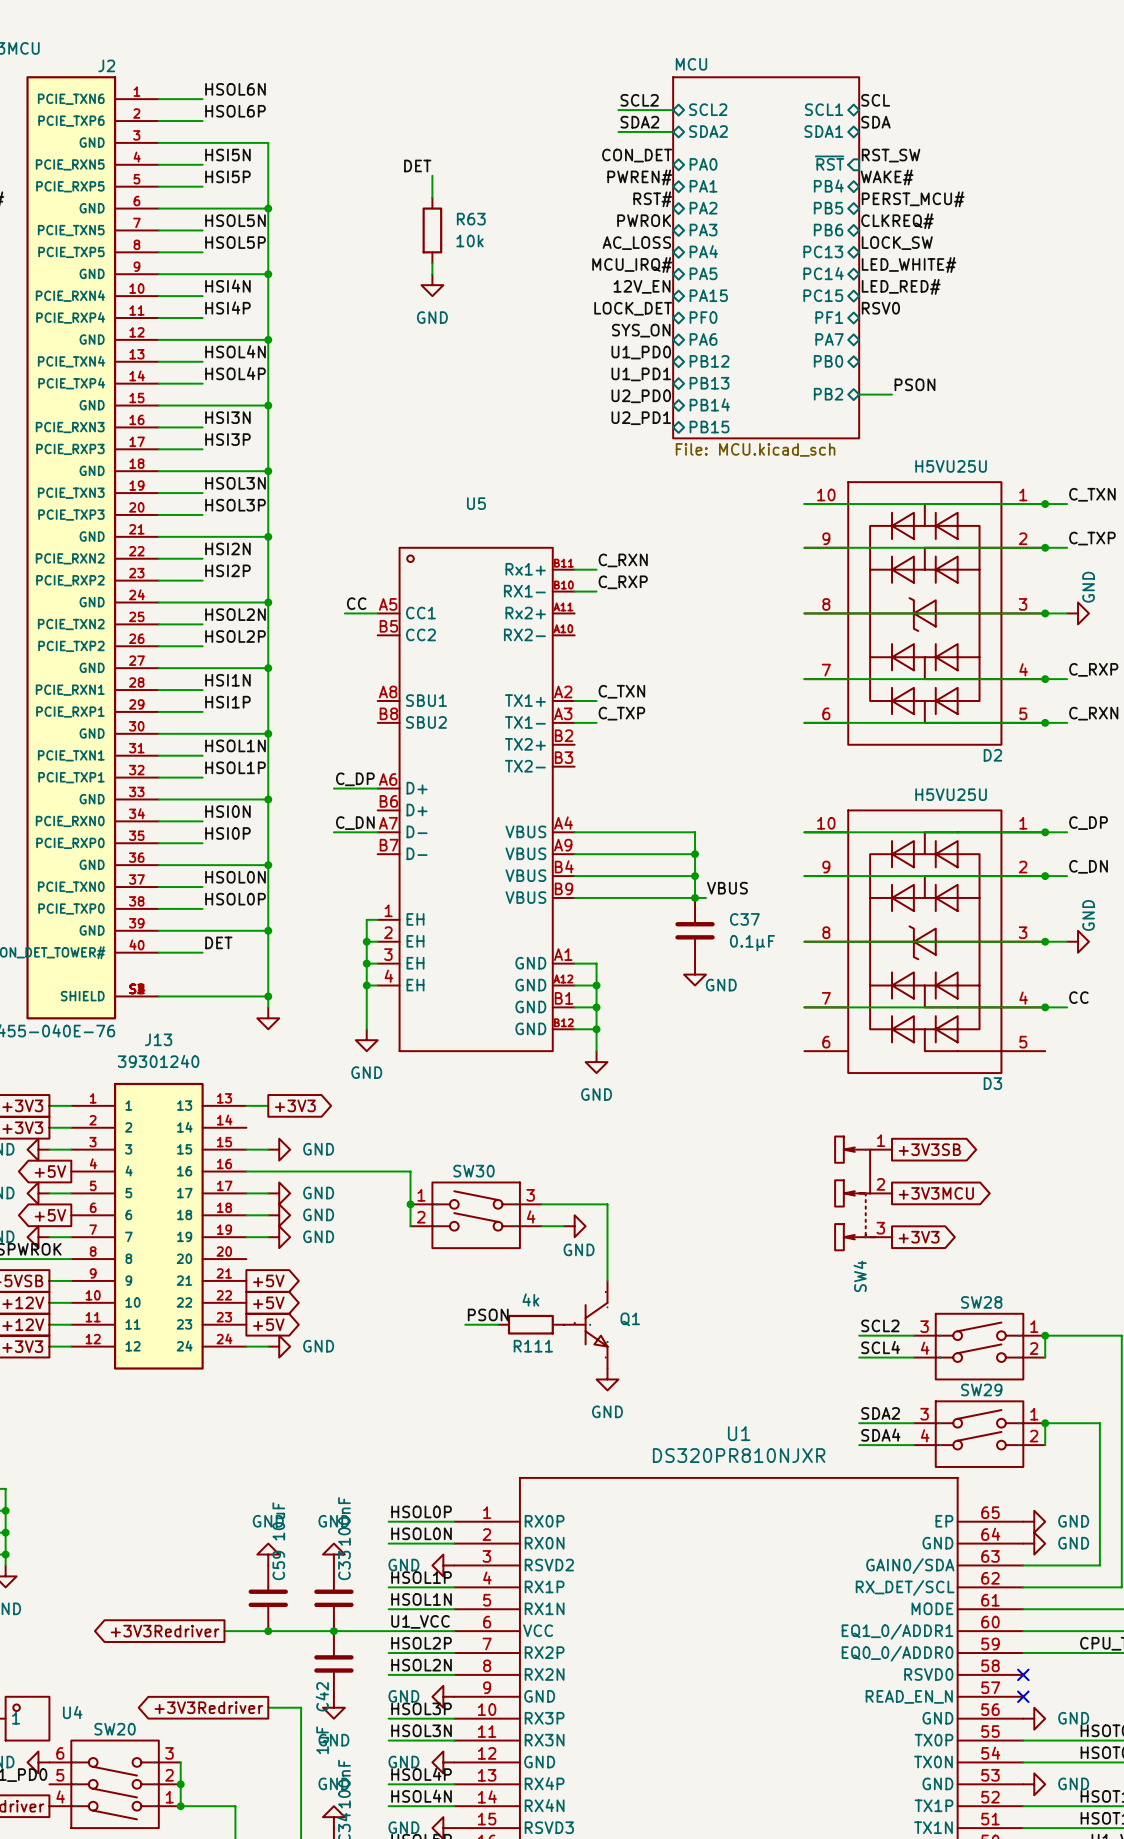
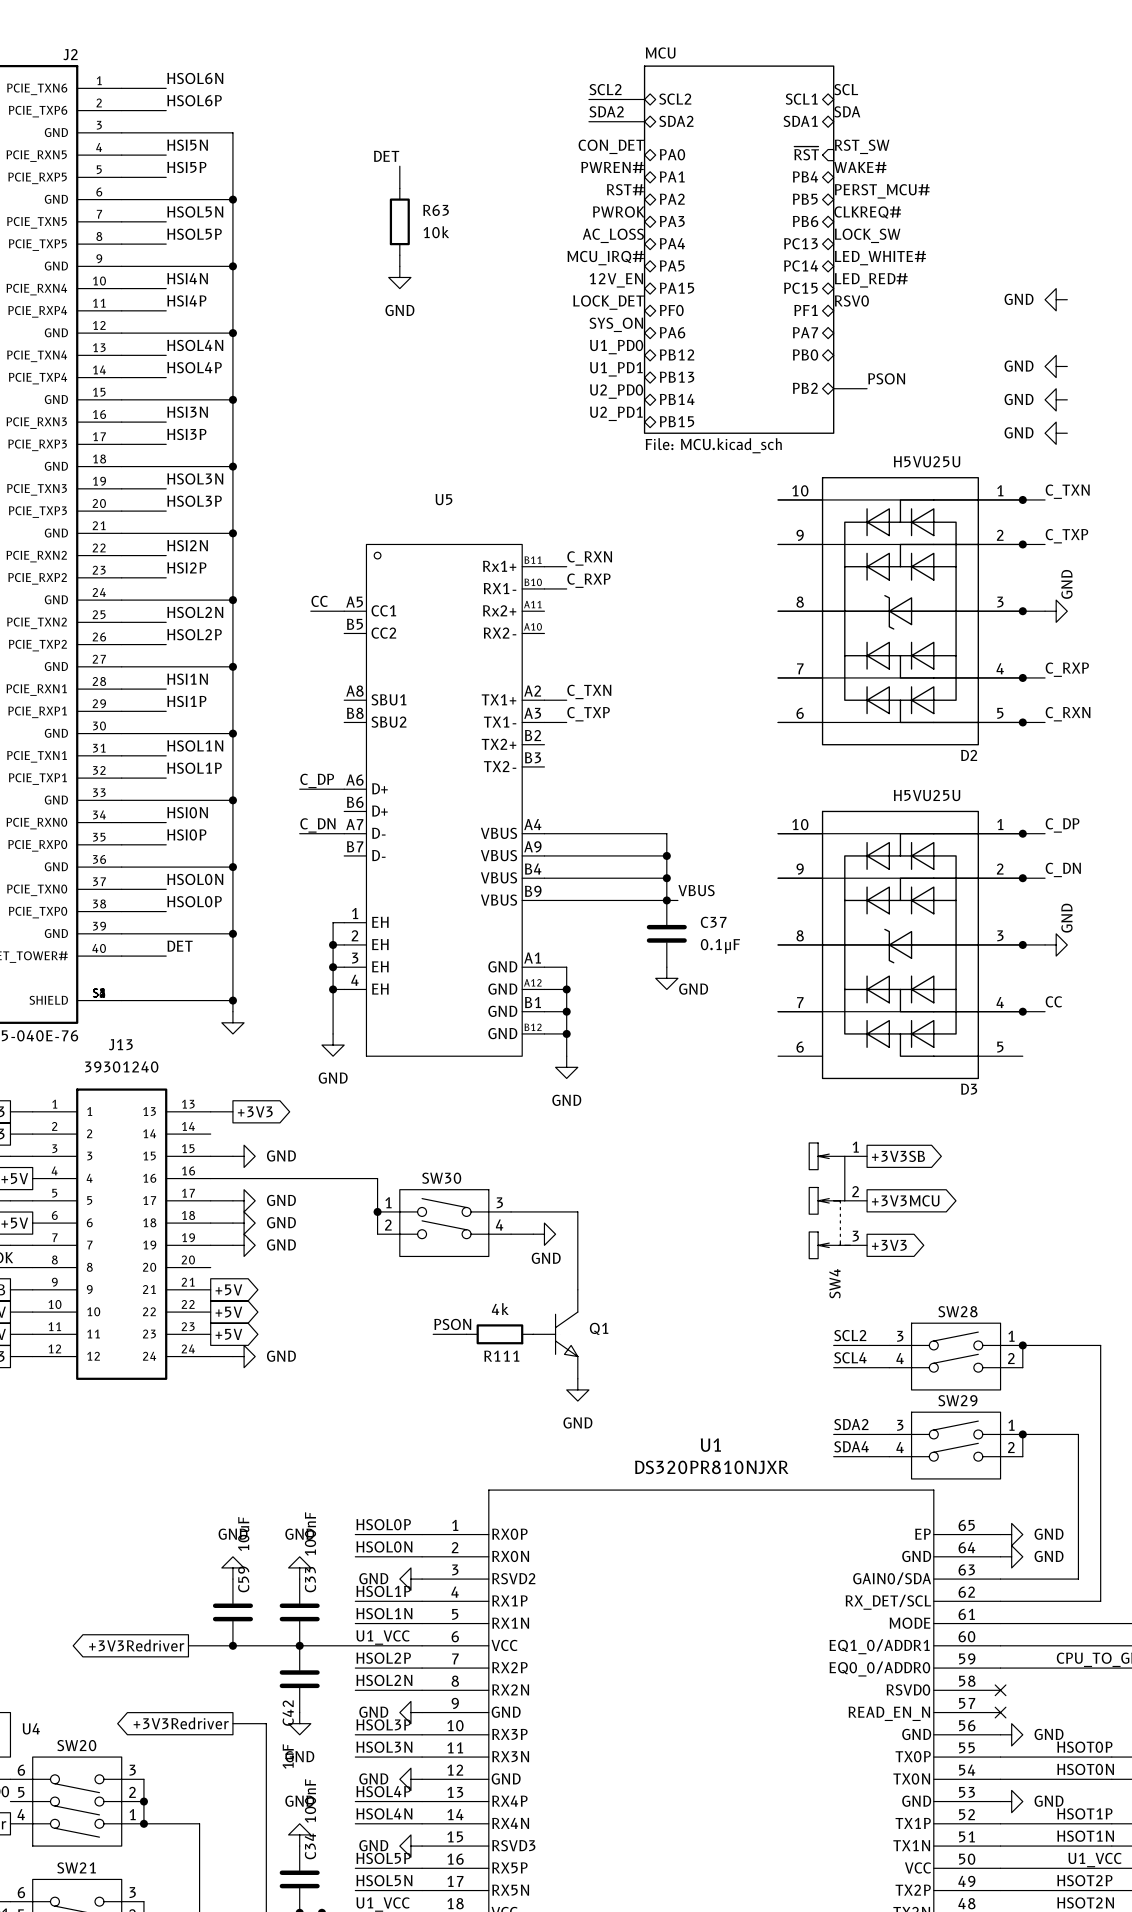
power symbol: none -> GND (1056, 299)
power symbol: none -> GND (1056, 366)
power symbol: none -> GND (1056, 399)
power symbol: none -> GND (1056, 433)

